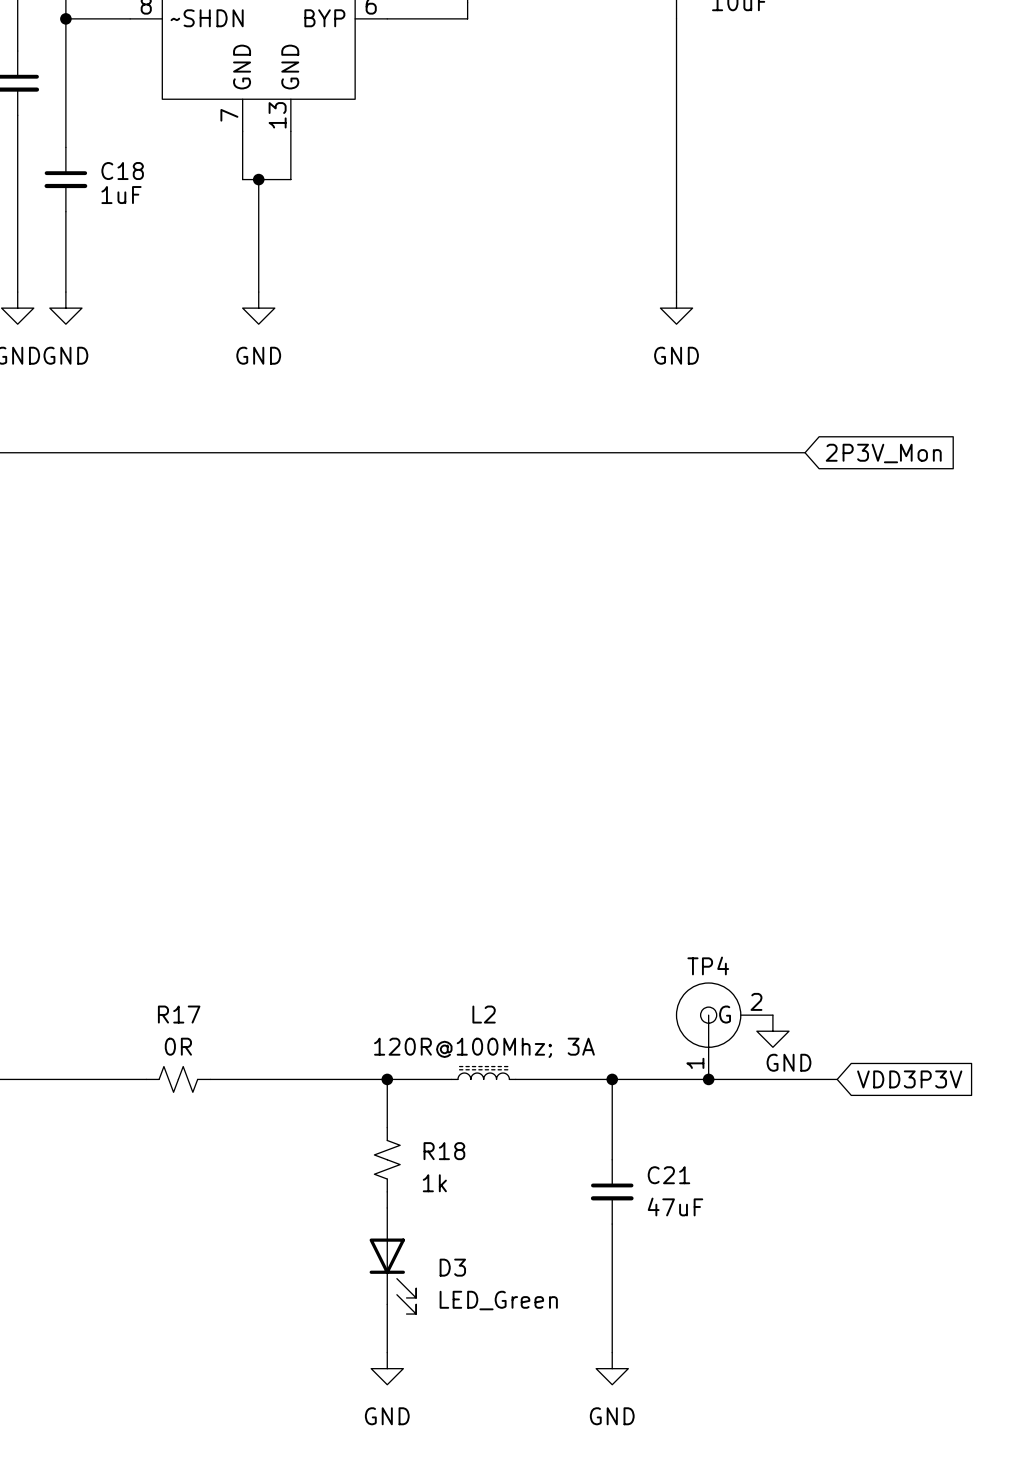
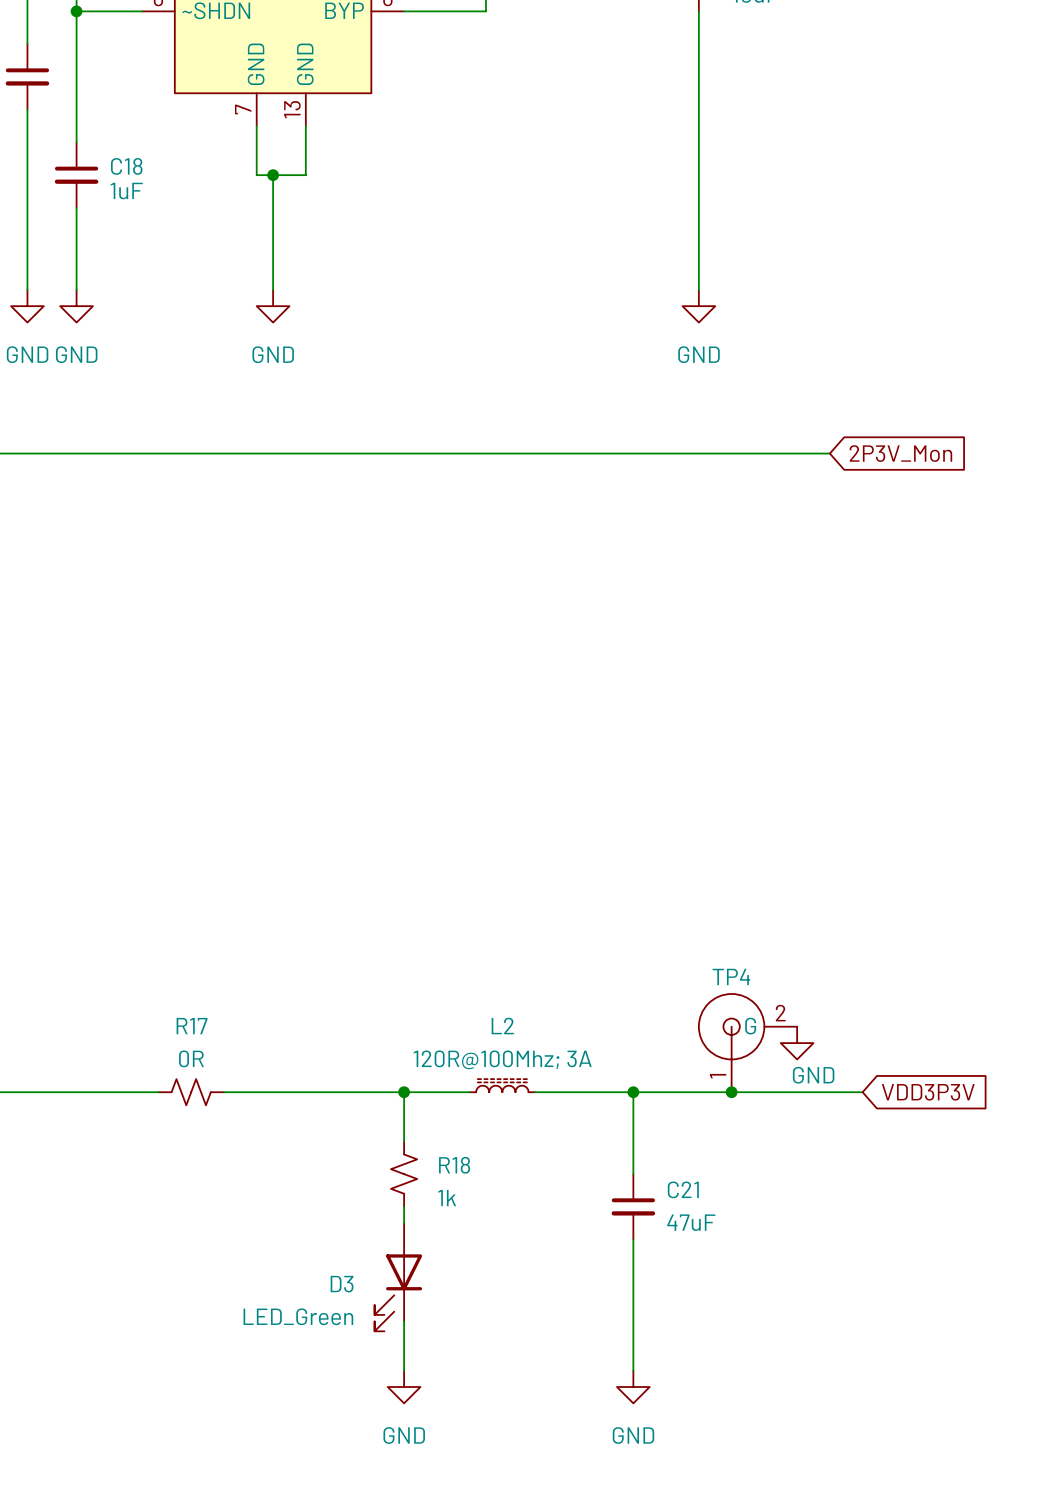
D3 flip: as is (392, 1276) -> left-right (398, 1292)

